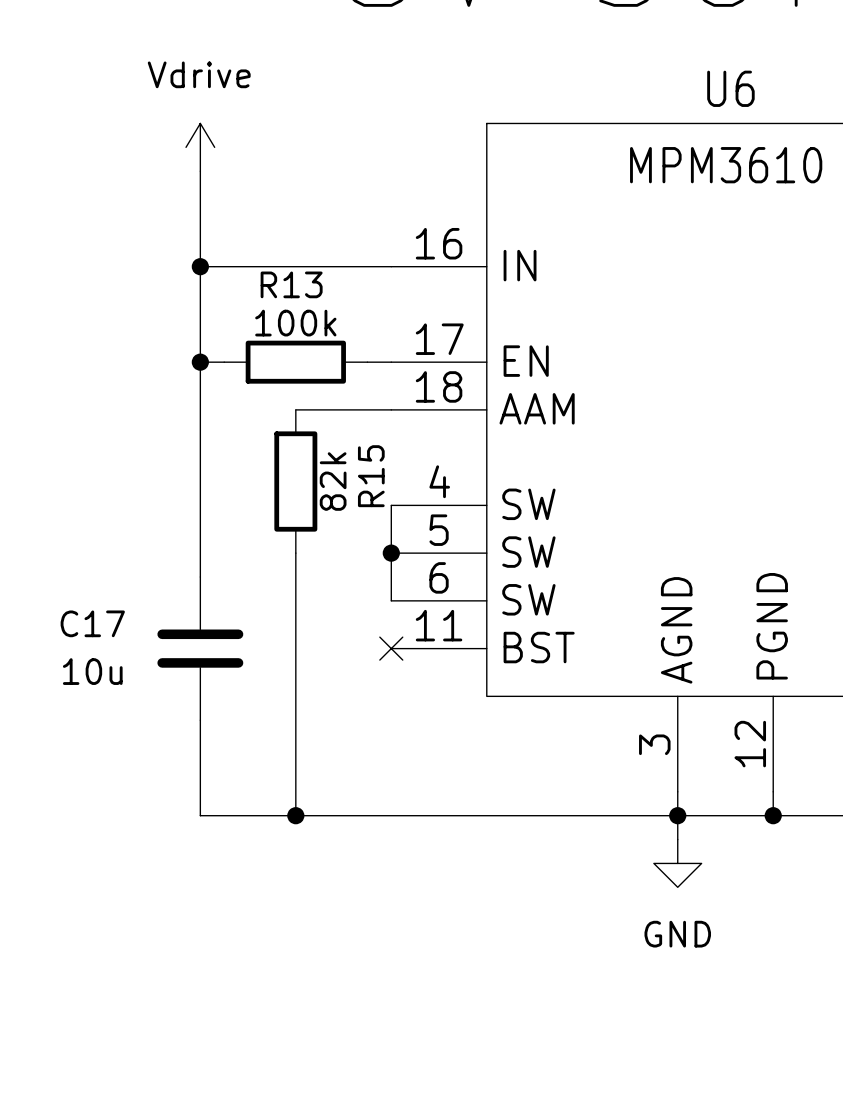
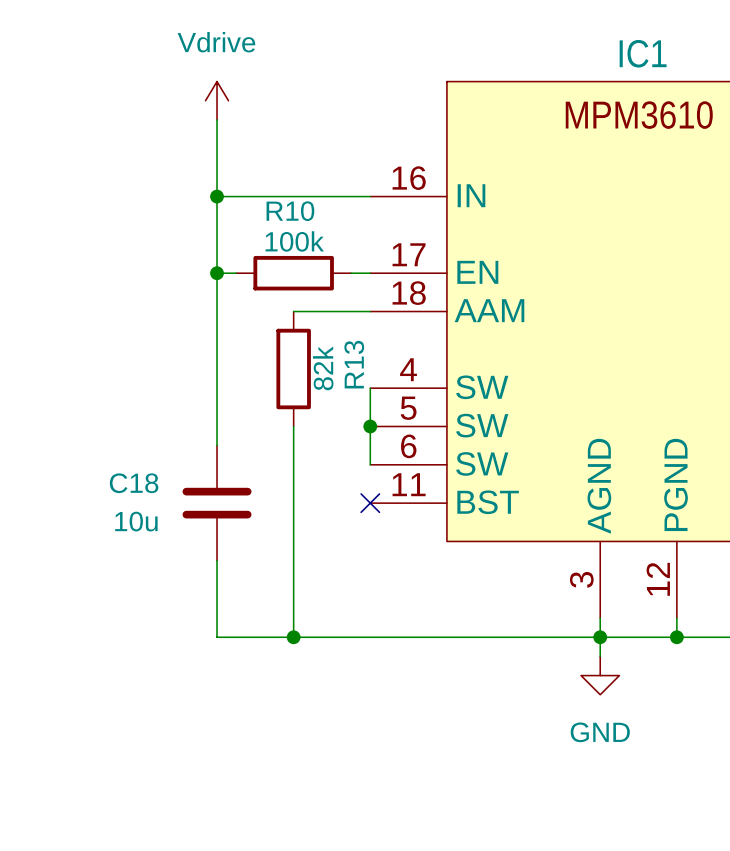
U6 name: U6 (730, 88) -> IC1 (643, 53)
R13 name: R13 (291, 284) -> R10 (290, 211)
R15 name: R15 (371, 476) -> R13 (354, 364)
C17 name: C17 (92, 623) -> C18 (134, 483)

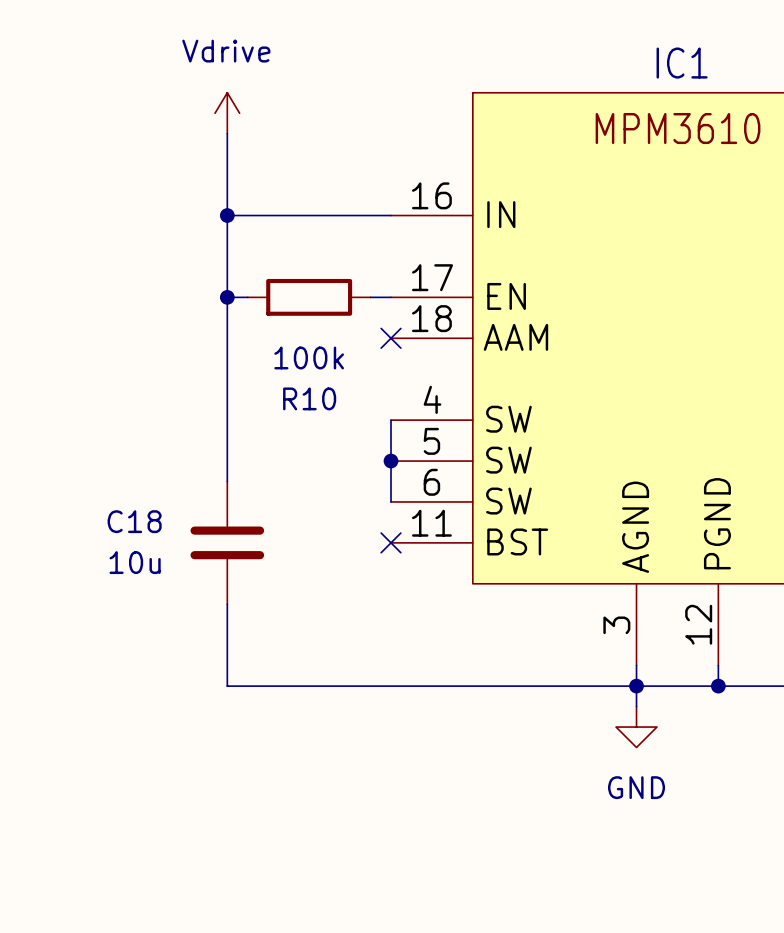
R10 name position: R10 (290, 211) -> R10 (309, 398)
R10 value position: 100k (294, 241) -> 100k (309, 357)
wire: (293, 311) (370, 311) -> none
no-connect mark: none -> (391, 338)
R13: 82k (293, 369) -> none
wire: (293, 426) (293, 637) -> none
junction: (293, 637) -> none

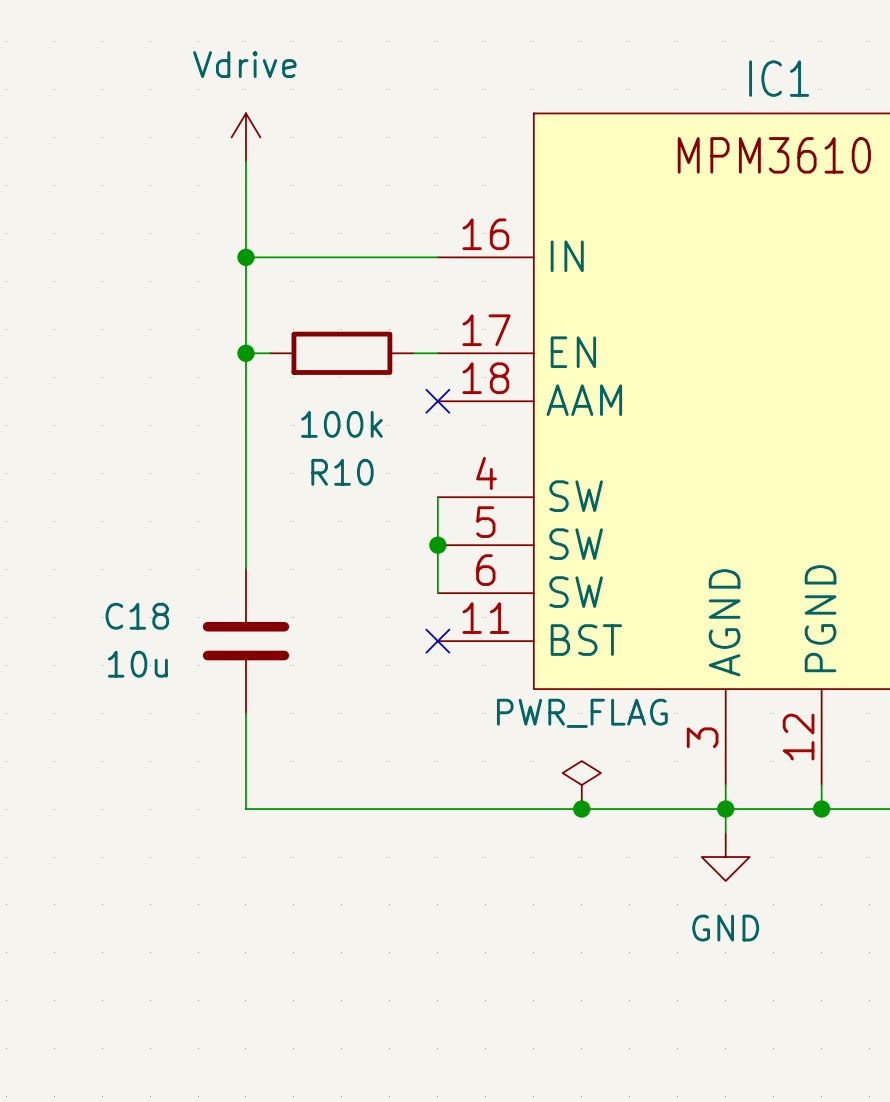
power symbol: none -> PWR_FLAG (581, 785)
junction: none -> (581, 809)

